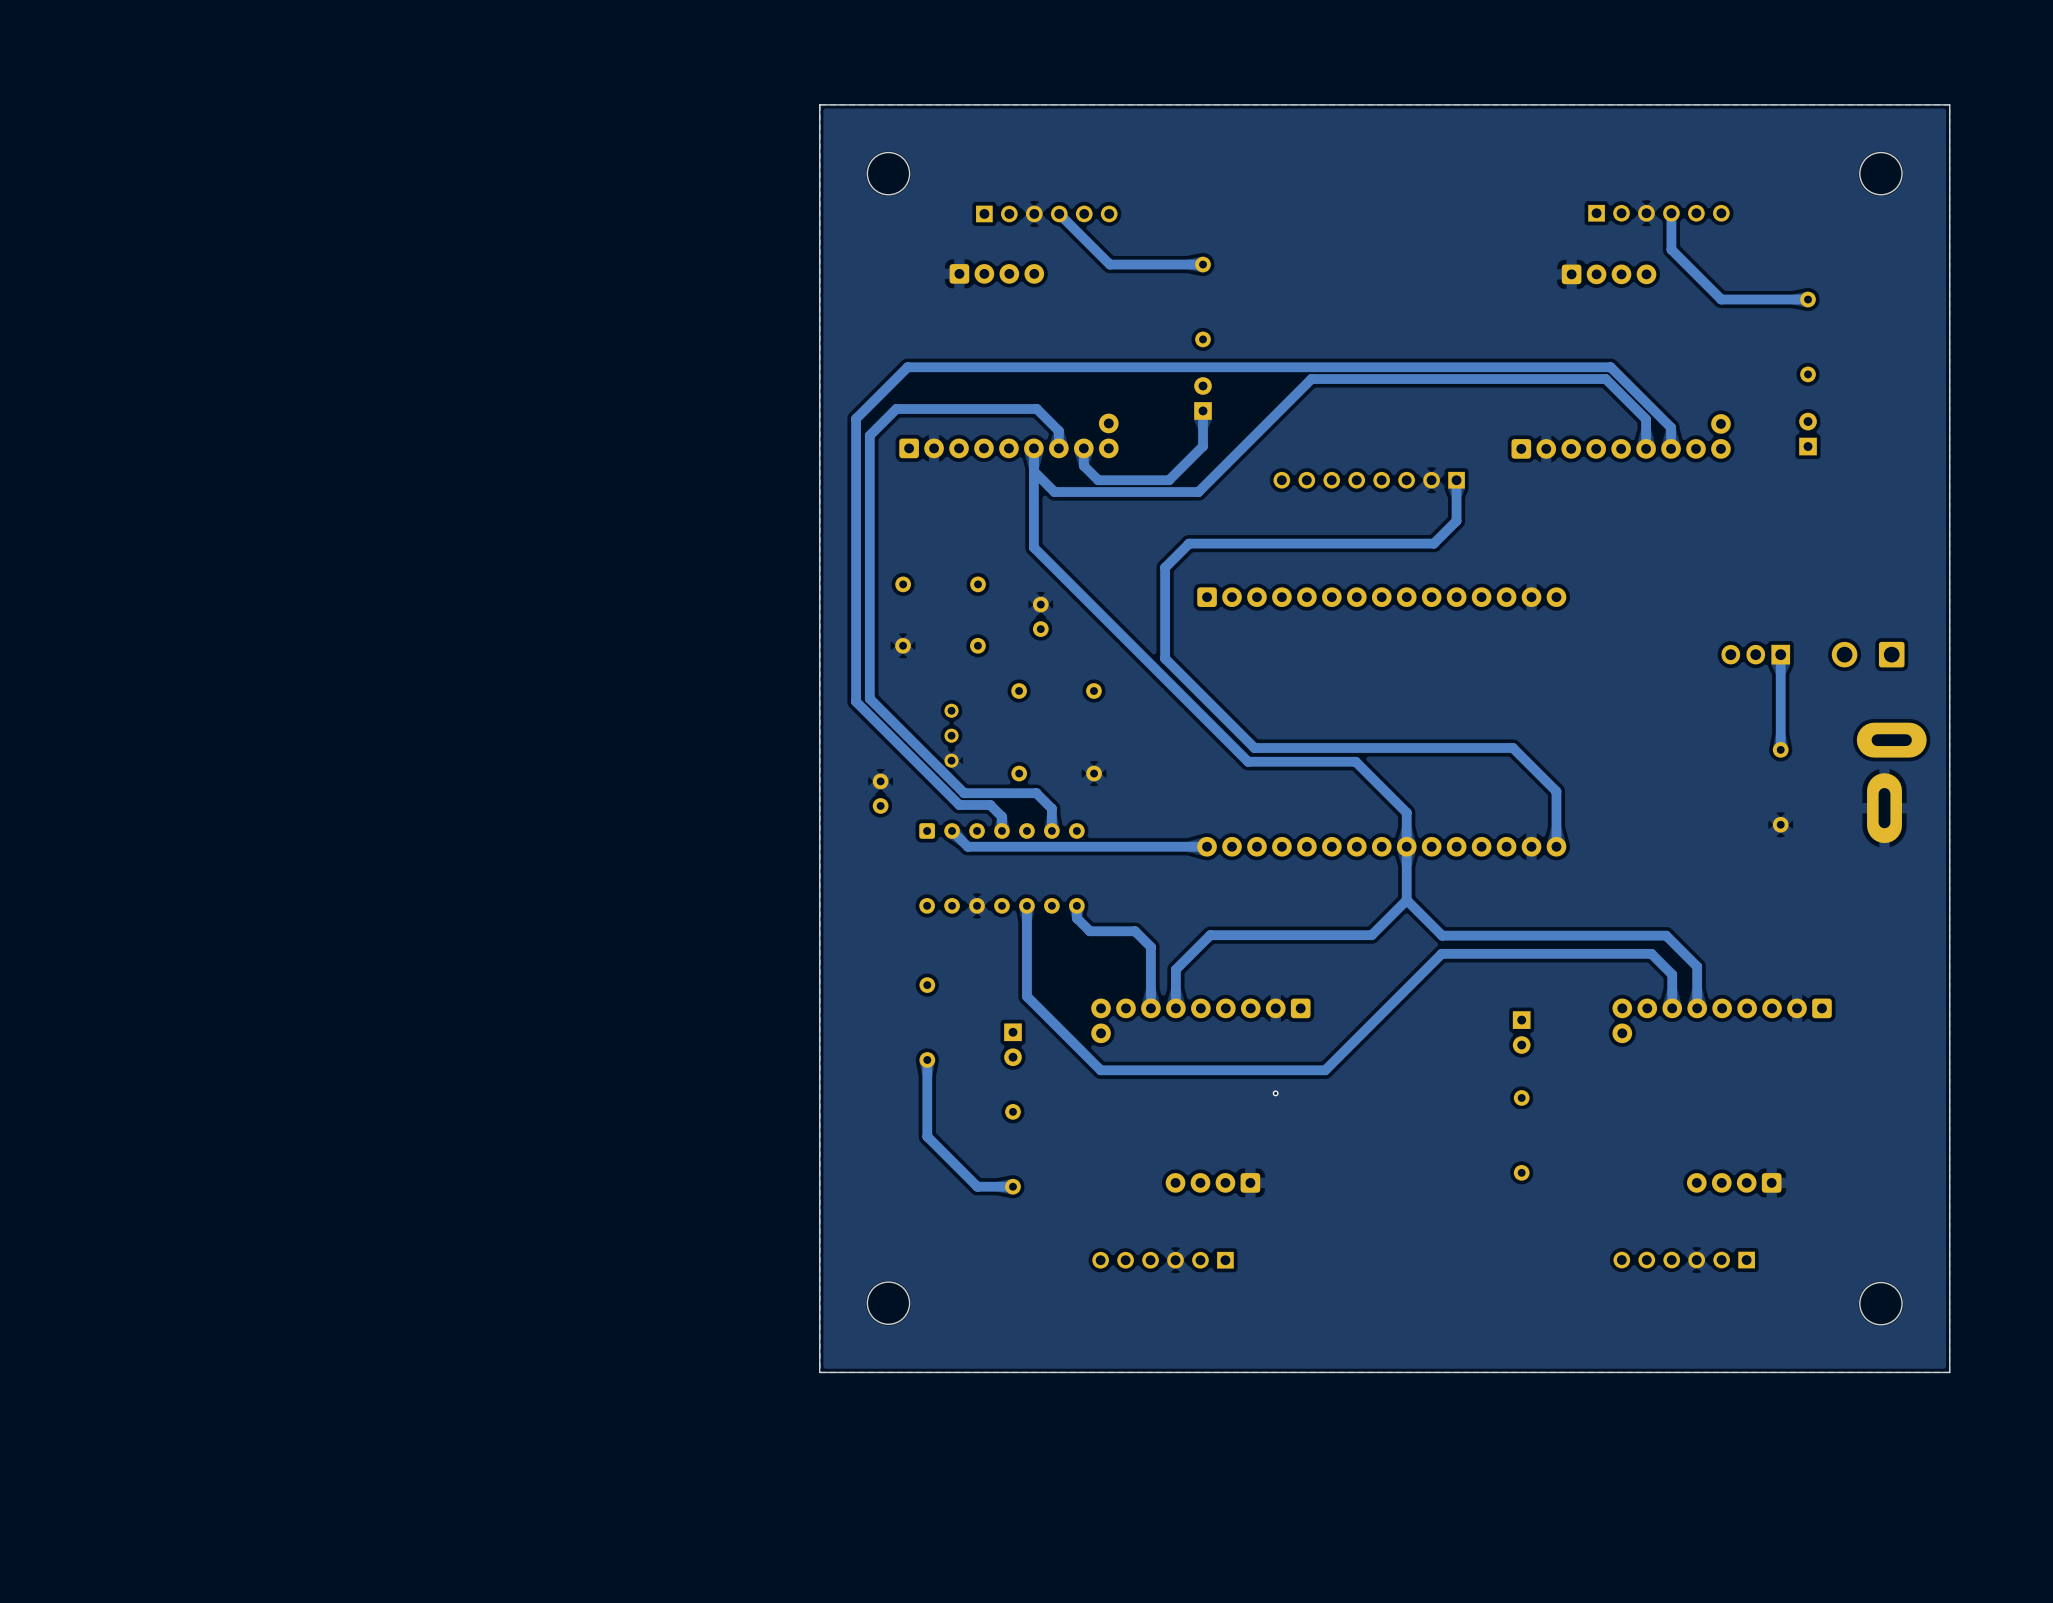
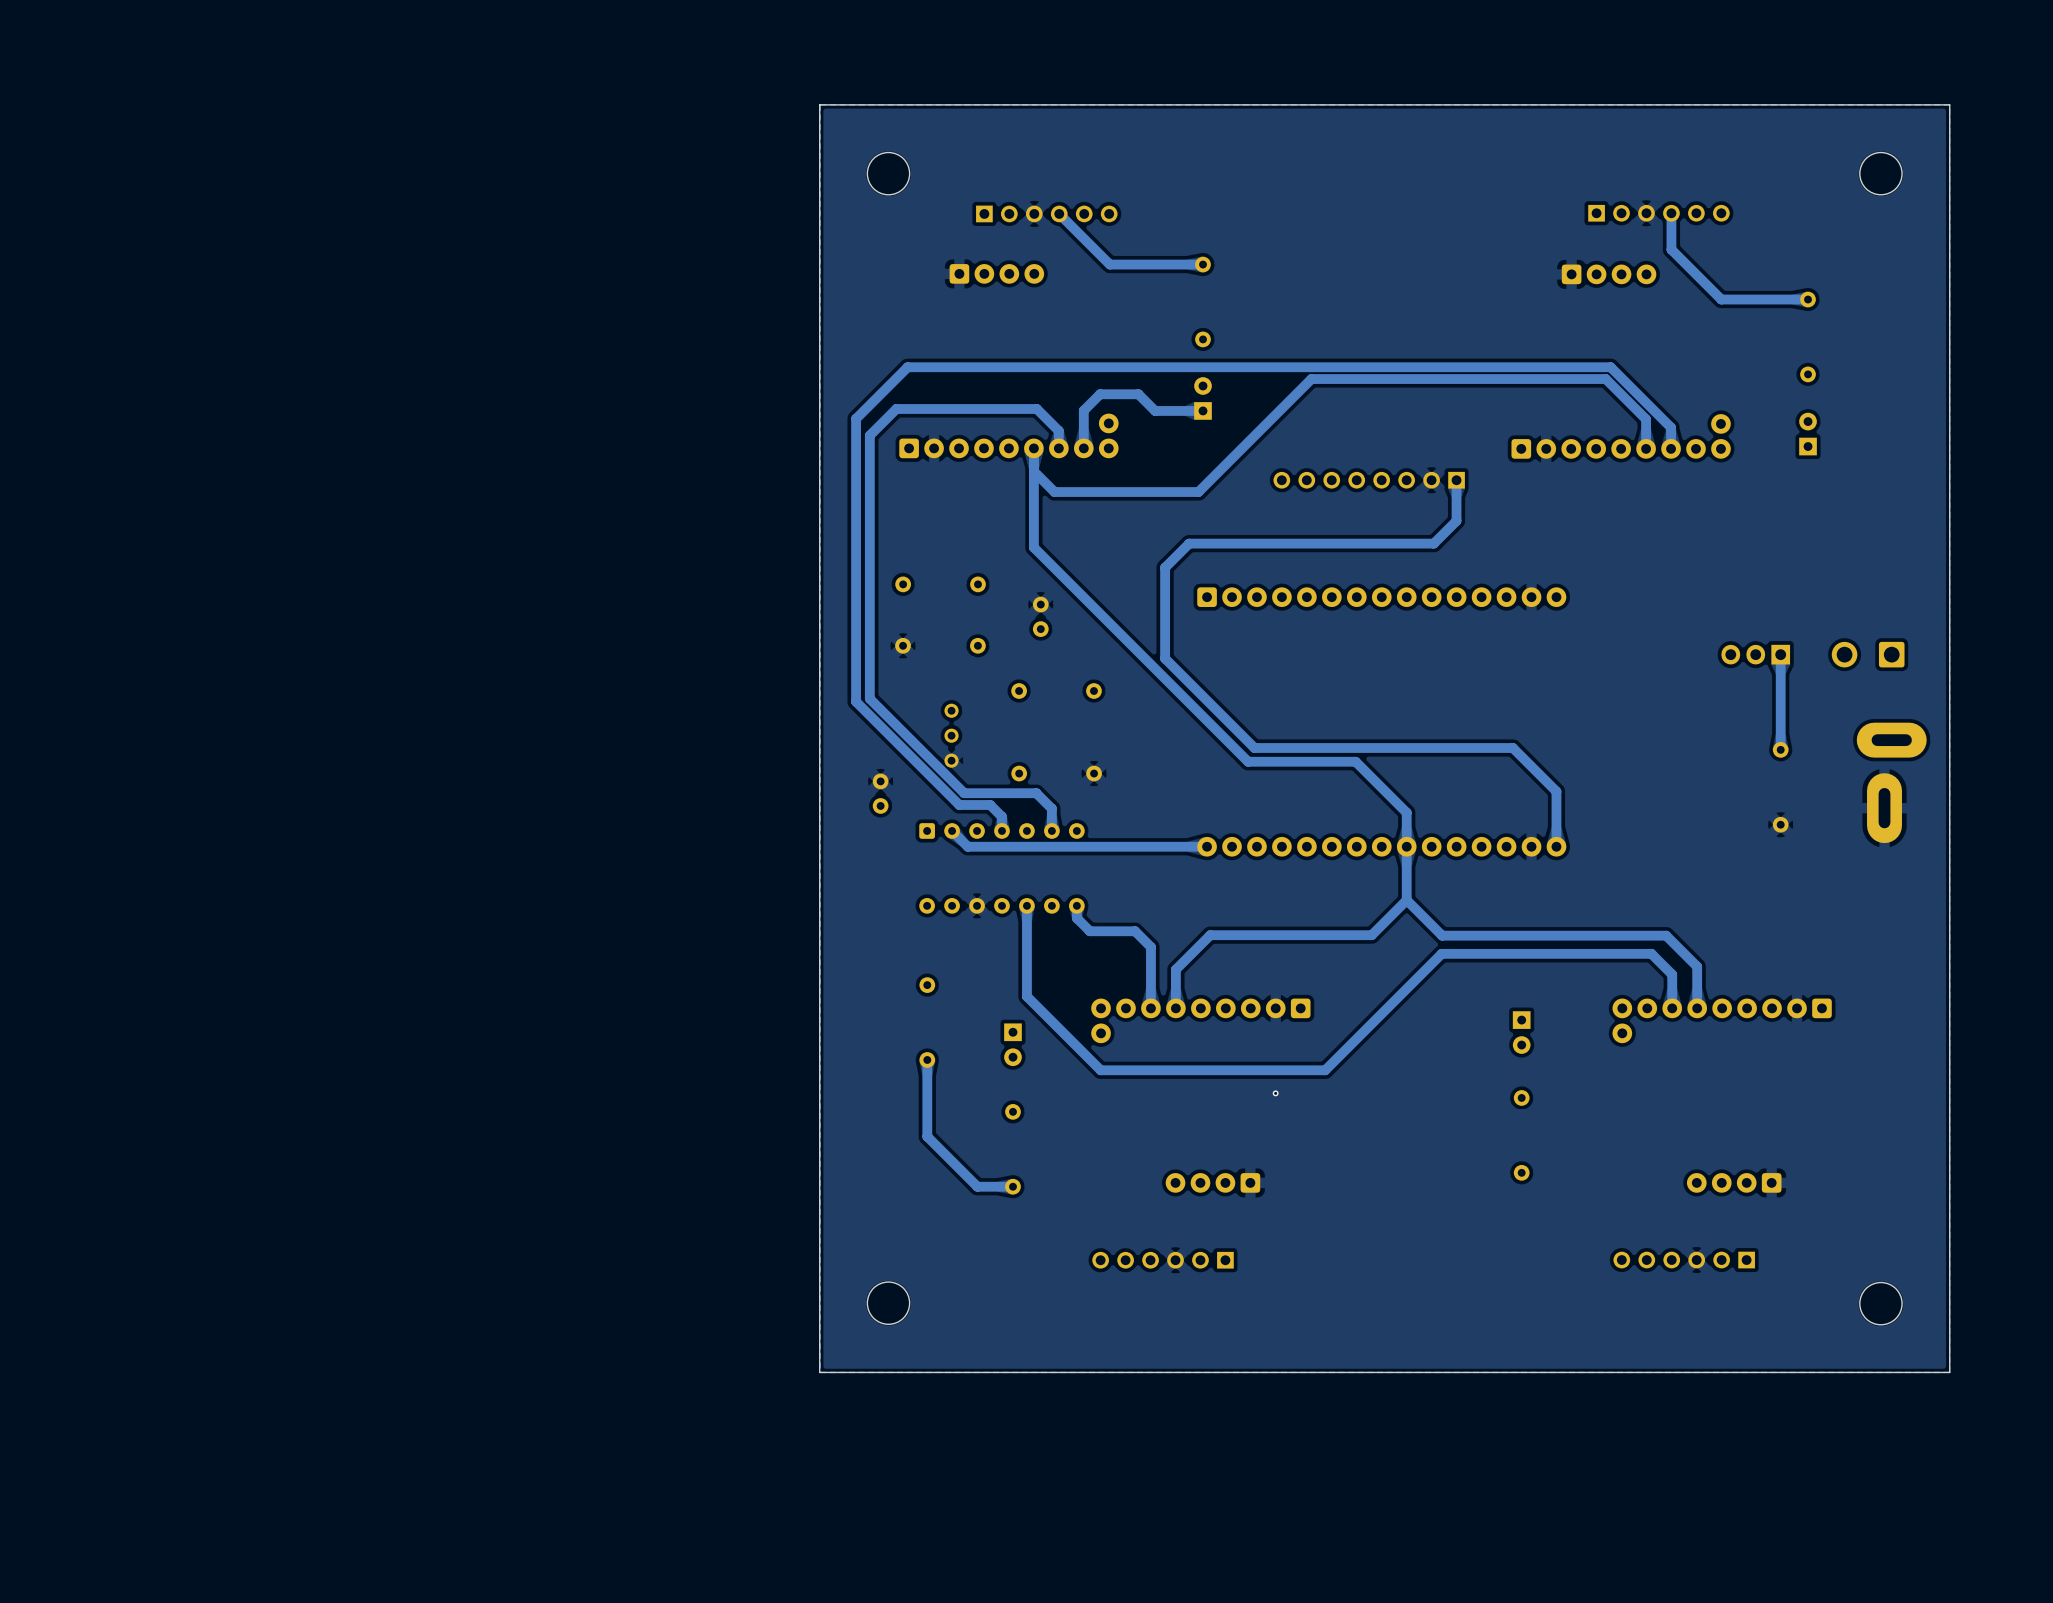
track: (1203, 410) (1203, 446) (1169, 480) (1098, 480) (1083, 465) (1083, 448) -> (1203, 410) (1155, 410) (1138, 394) (1100, 394) (1083, 410) (1083, 448)

